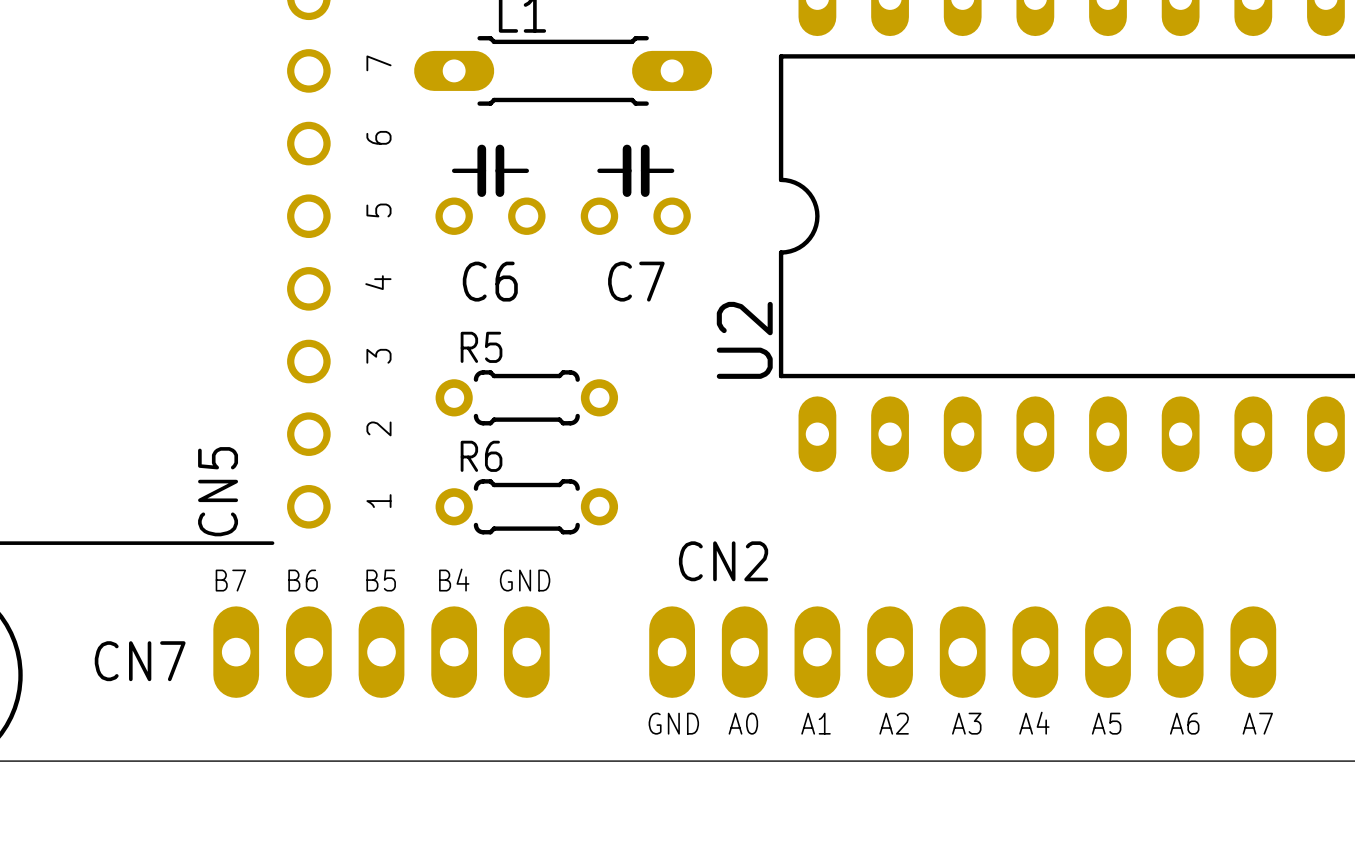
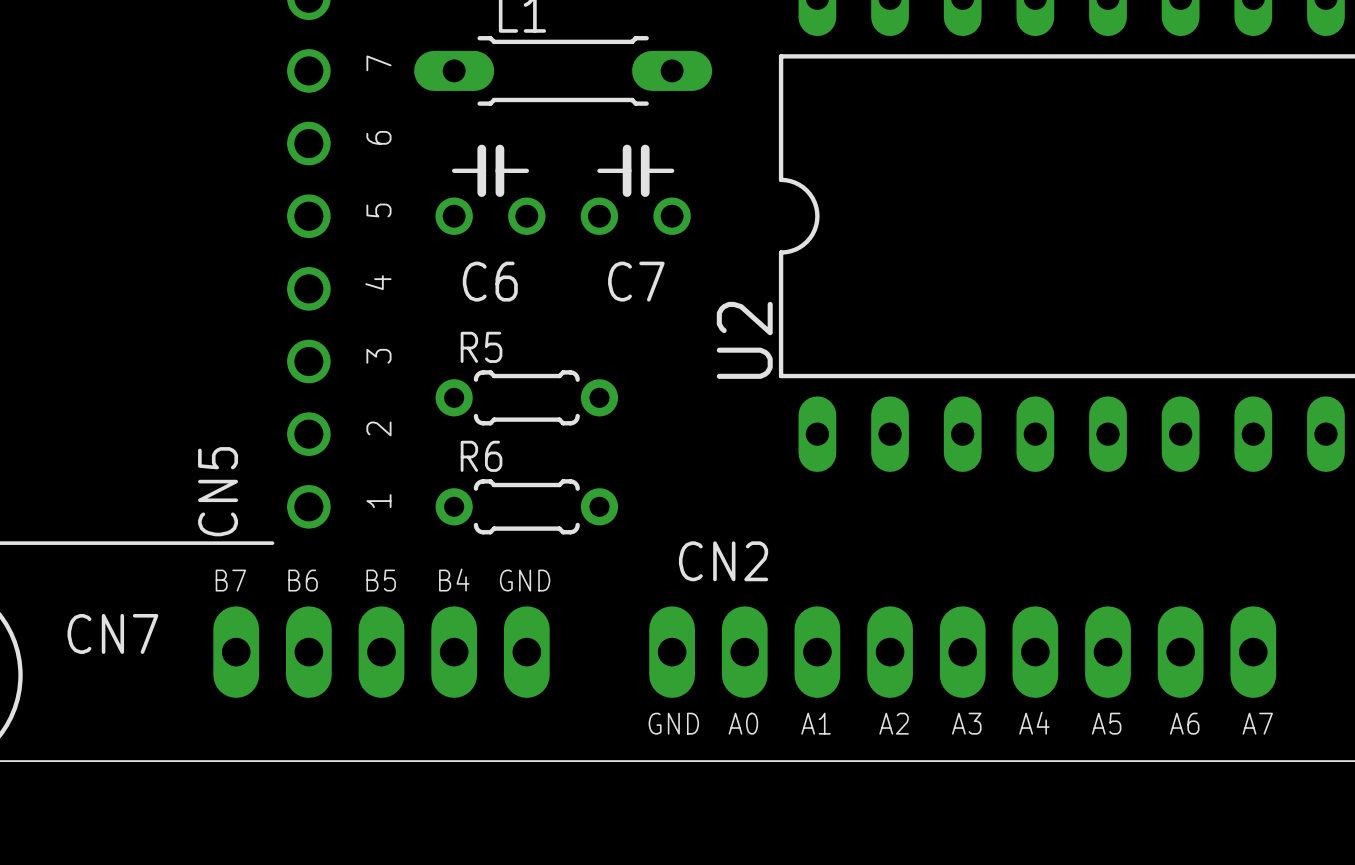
CN7 name position: CN7 (140, 661) -> CN7 (112, 633)

